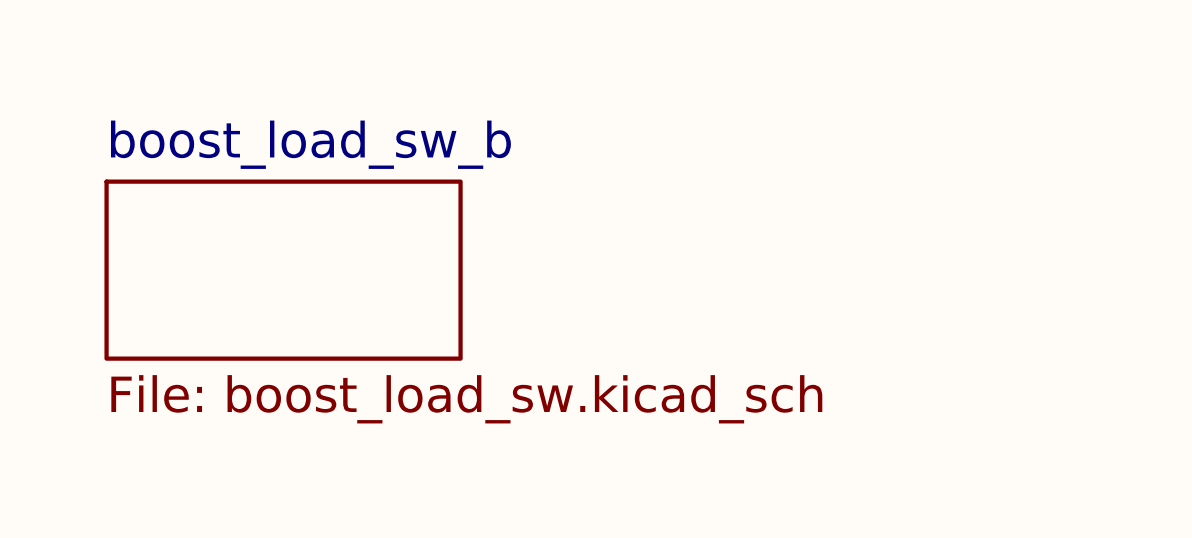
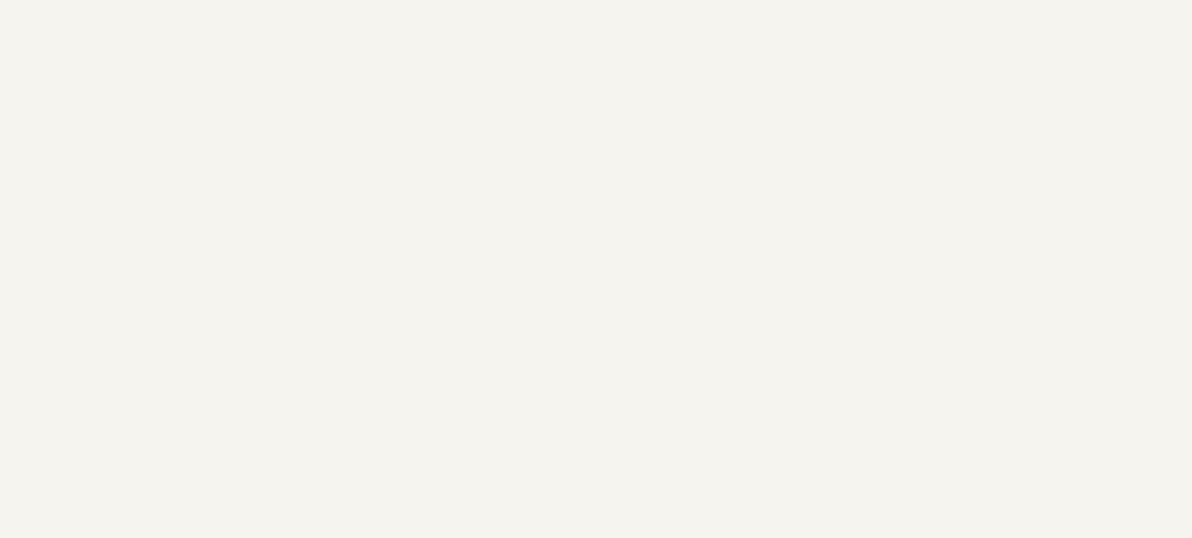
sheet boost_load_sw_b: File: boost_load_sw.kicad_sch (283, 270) -> none

